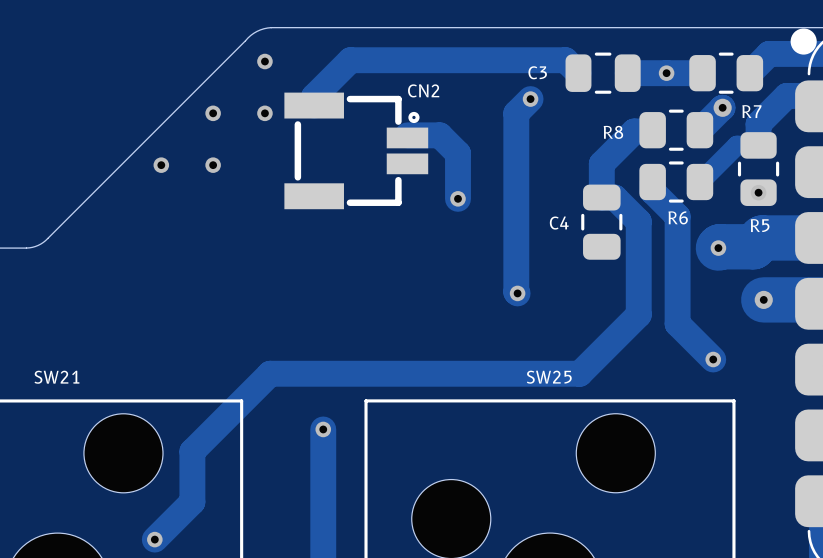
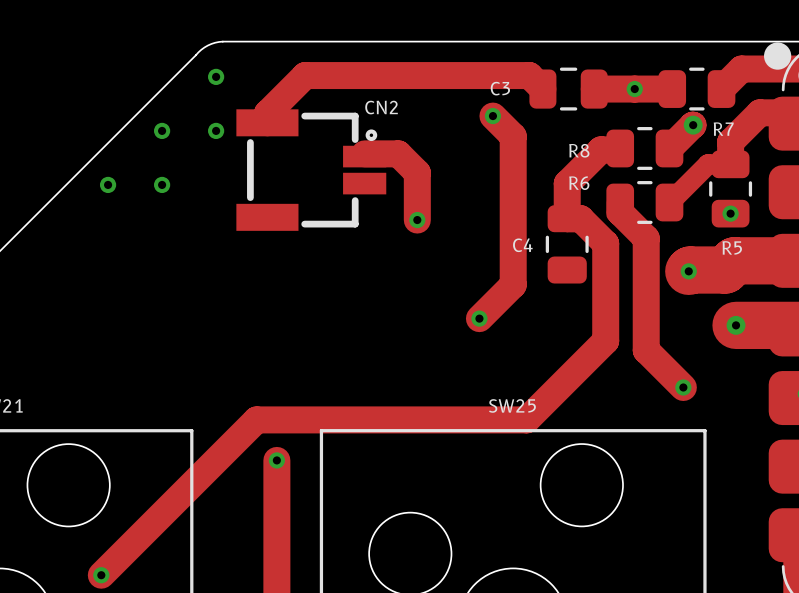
track: (530, 99) (516, 113) (517, 293) -> (492, 116) (513, 136) (513, 284) (479, 318)
R6 name position: R6 (678, 217) -> R6 (579, 183)
track: (579, 373) (270, 373) (192, 451) (192, 502) -> (544, 402) (526, 419) (256, 419) (140, 536)

